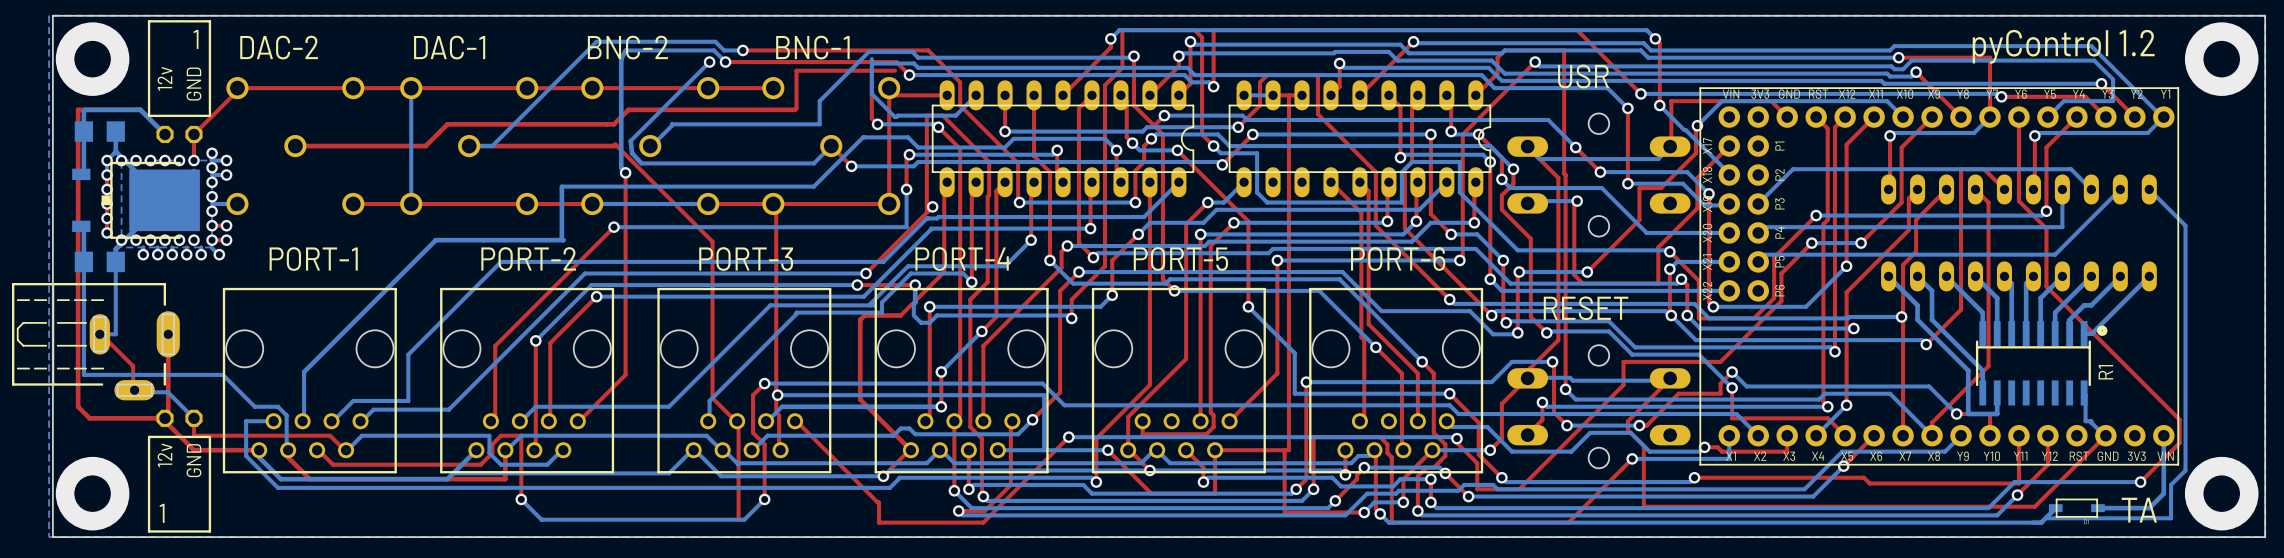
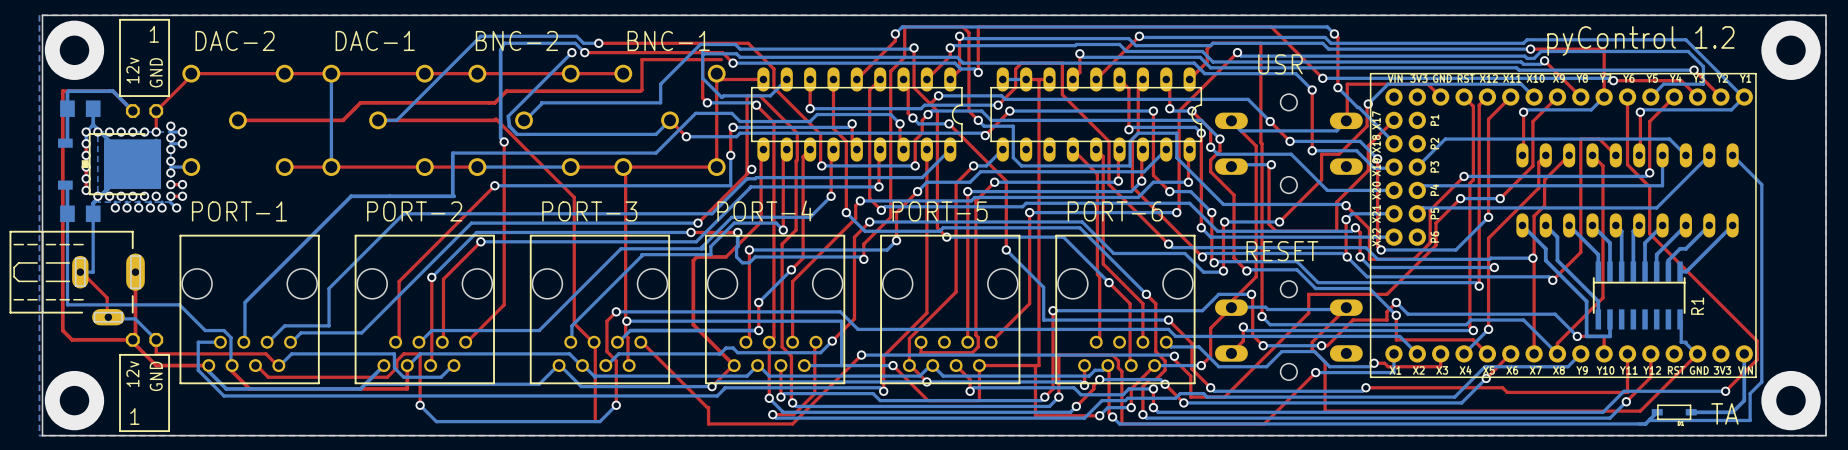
drawing: [2097, 325, 2108, 336] -> none

